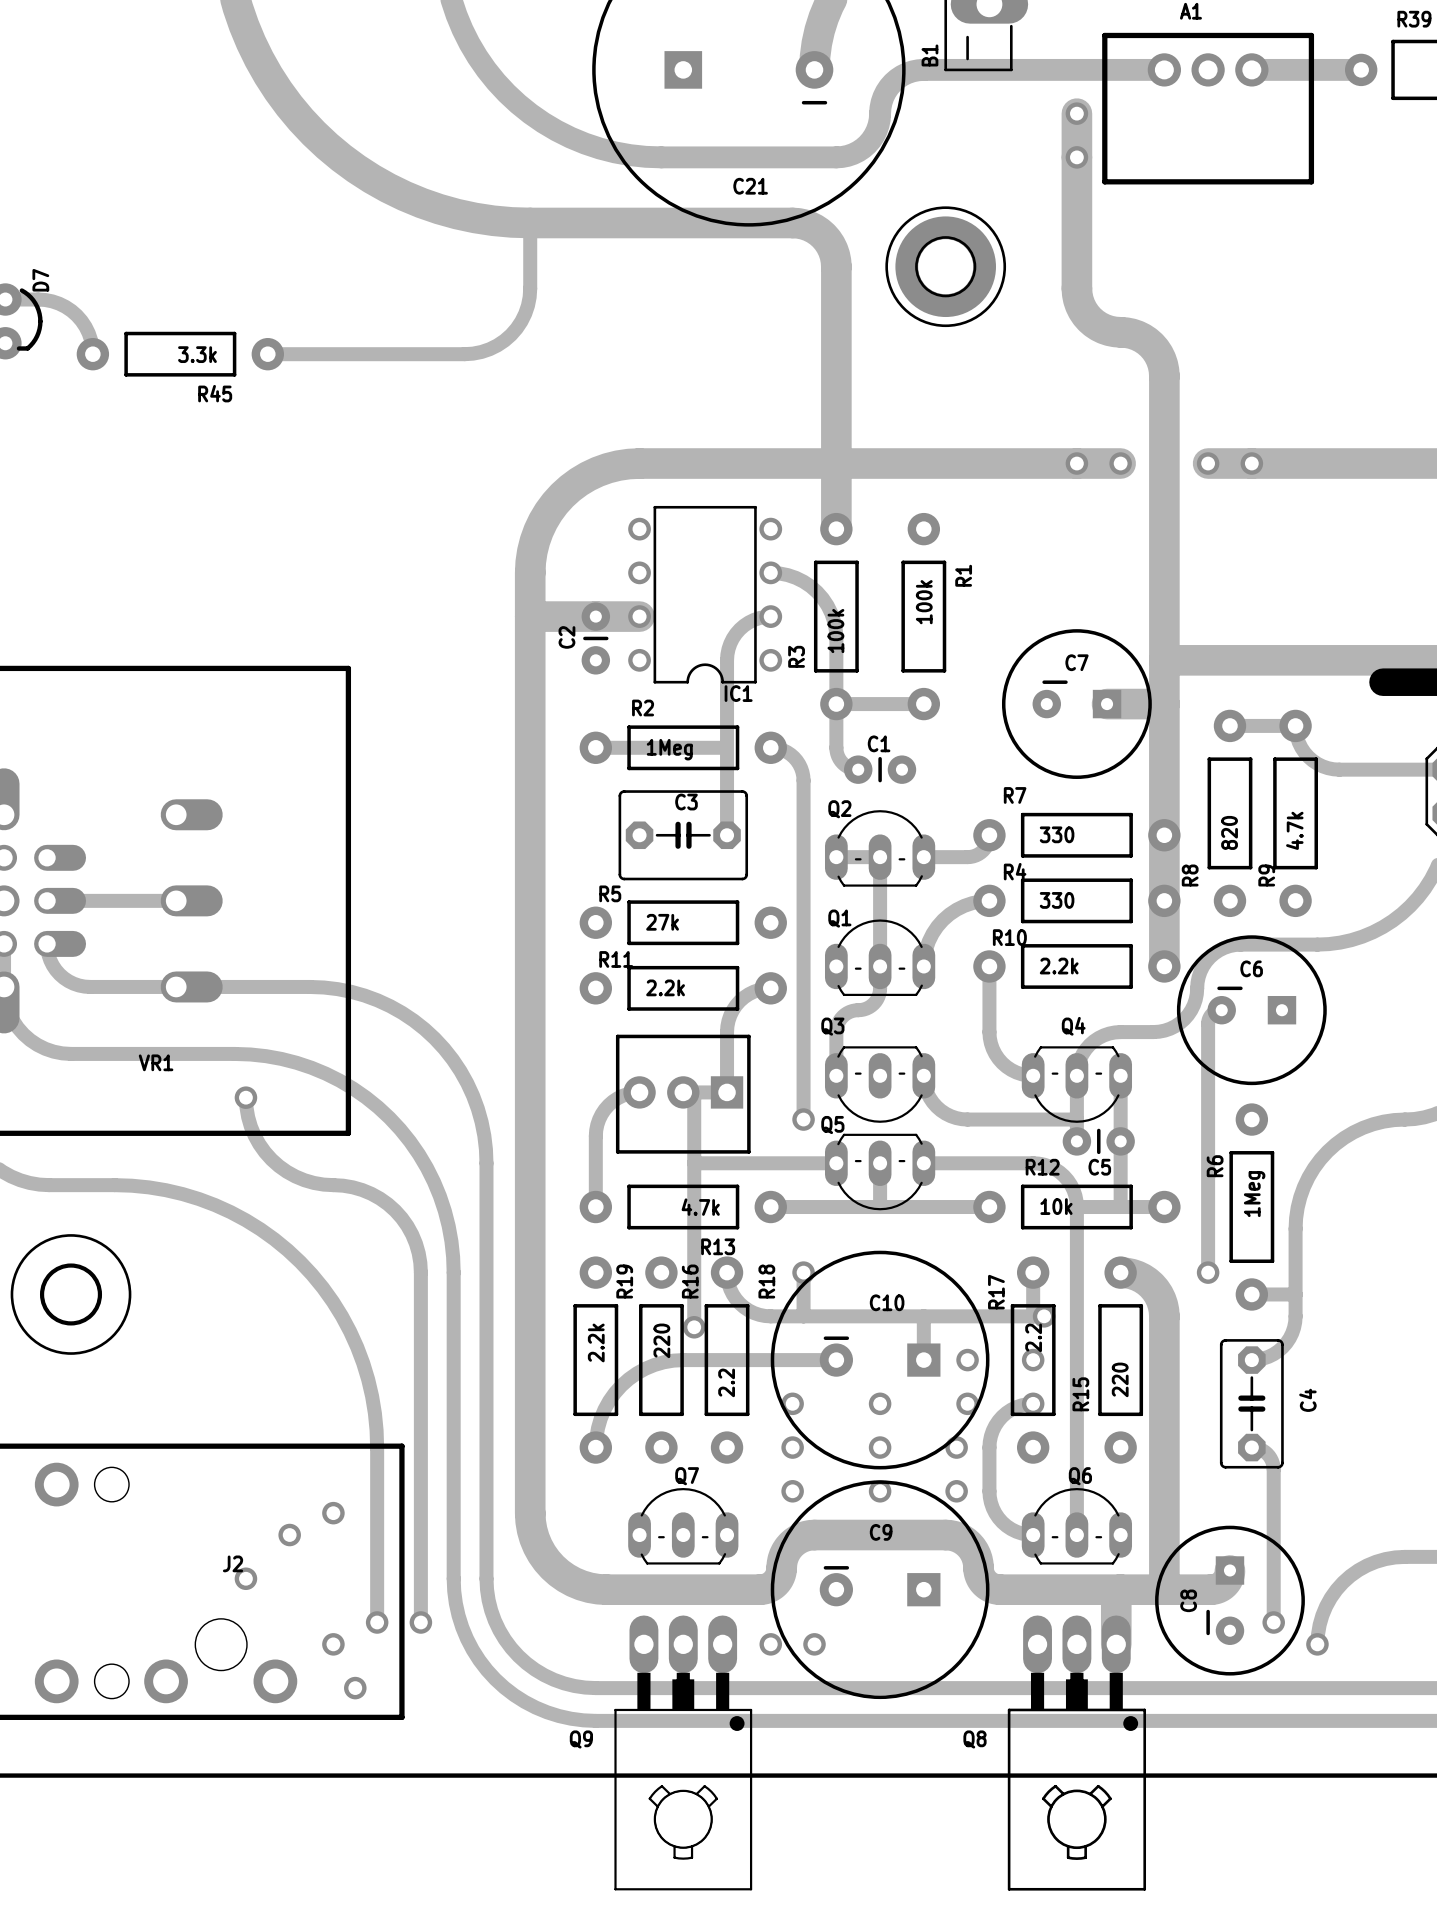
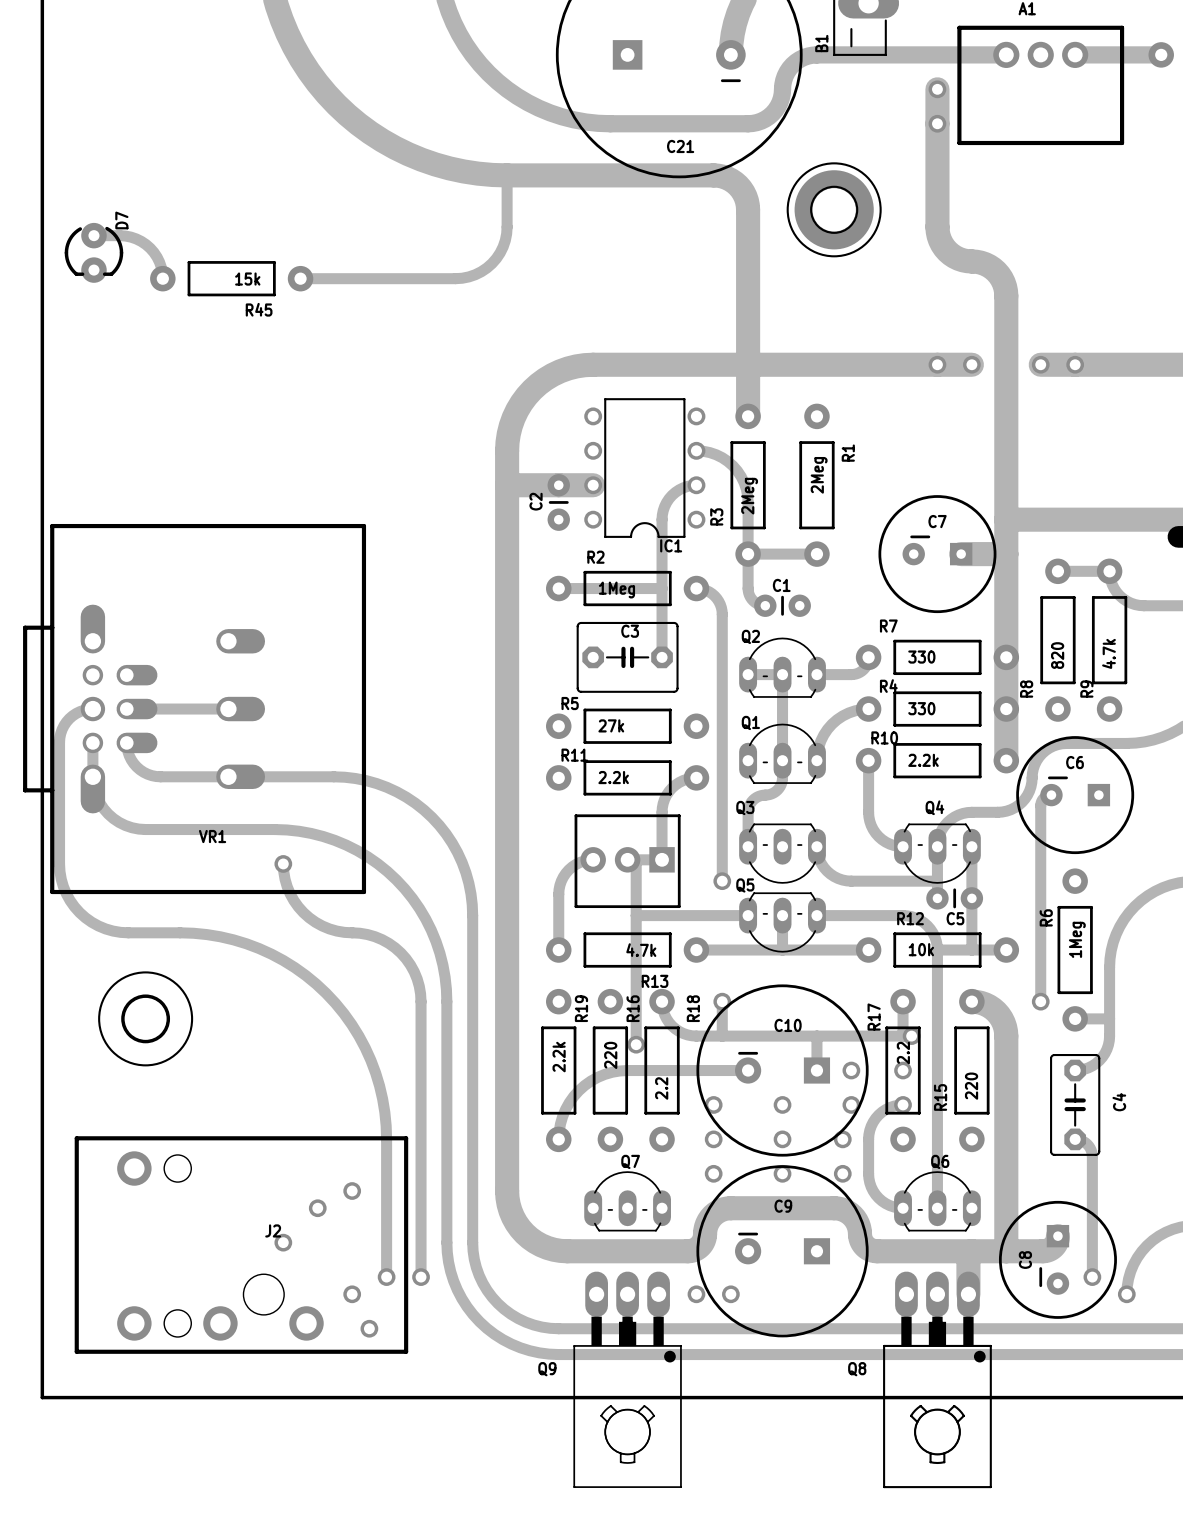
R45 value: 3.3k (197, 354) -> 15k (247, 279)
R1 value: 100k (924, 602) -> 2Meg (819, 475)
R3 value: 100k (835, 631) -> 2Meg (749, 496)

